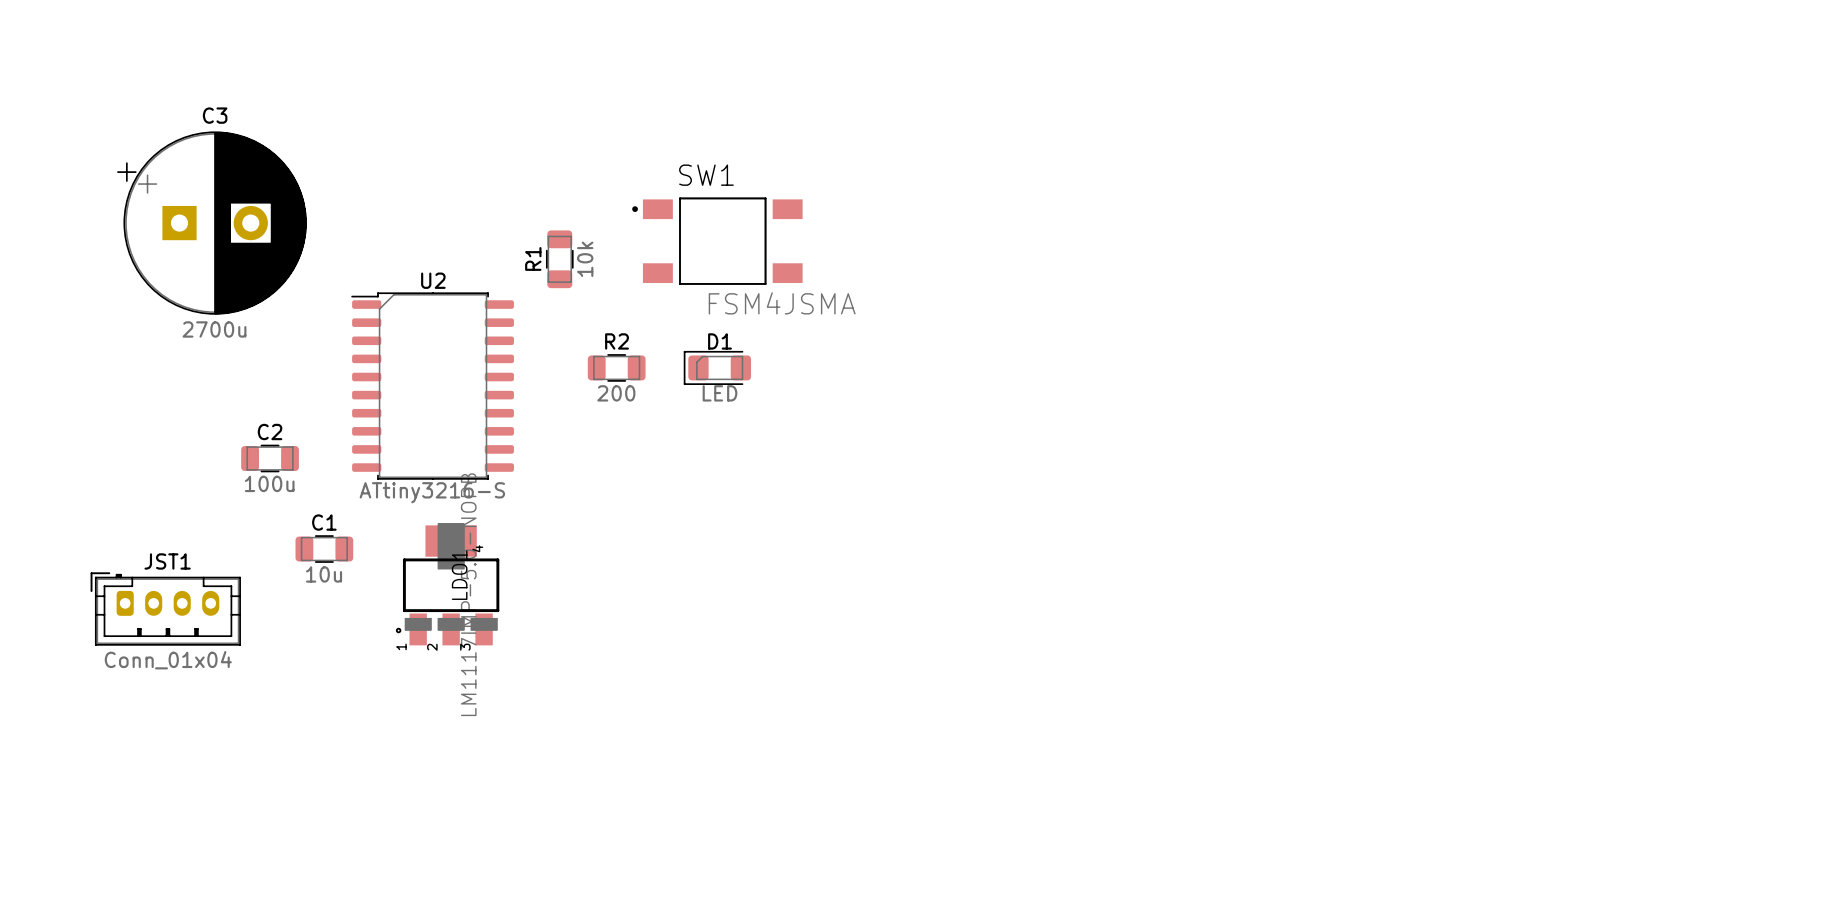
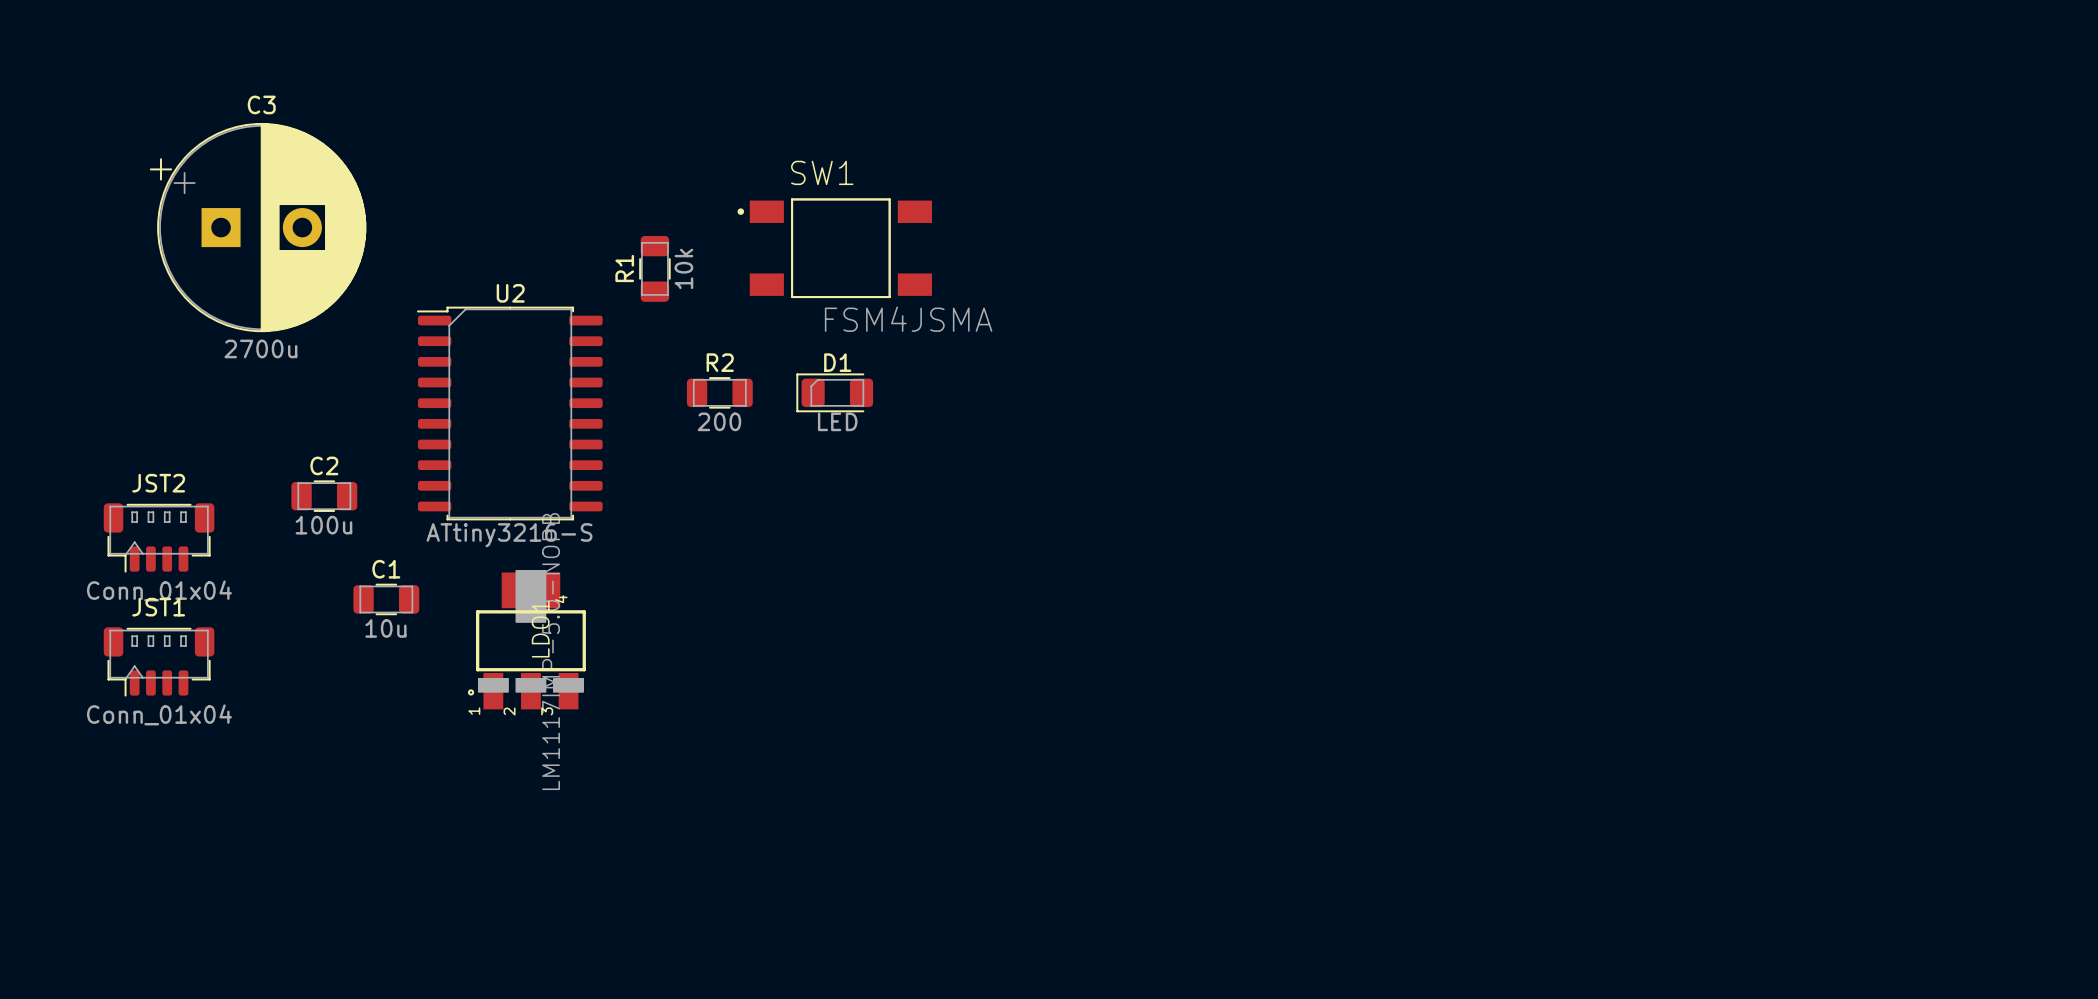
JST2: none -> Conn_01x04 (159, 537)
JST1 footprint: [90, 572, 241, 646] -> [103, 627, 215, 697]

